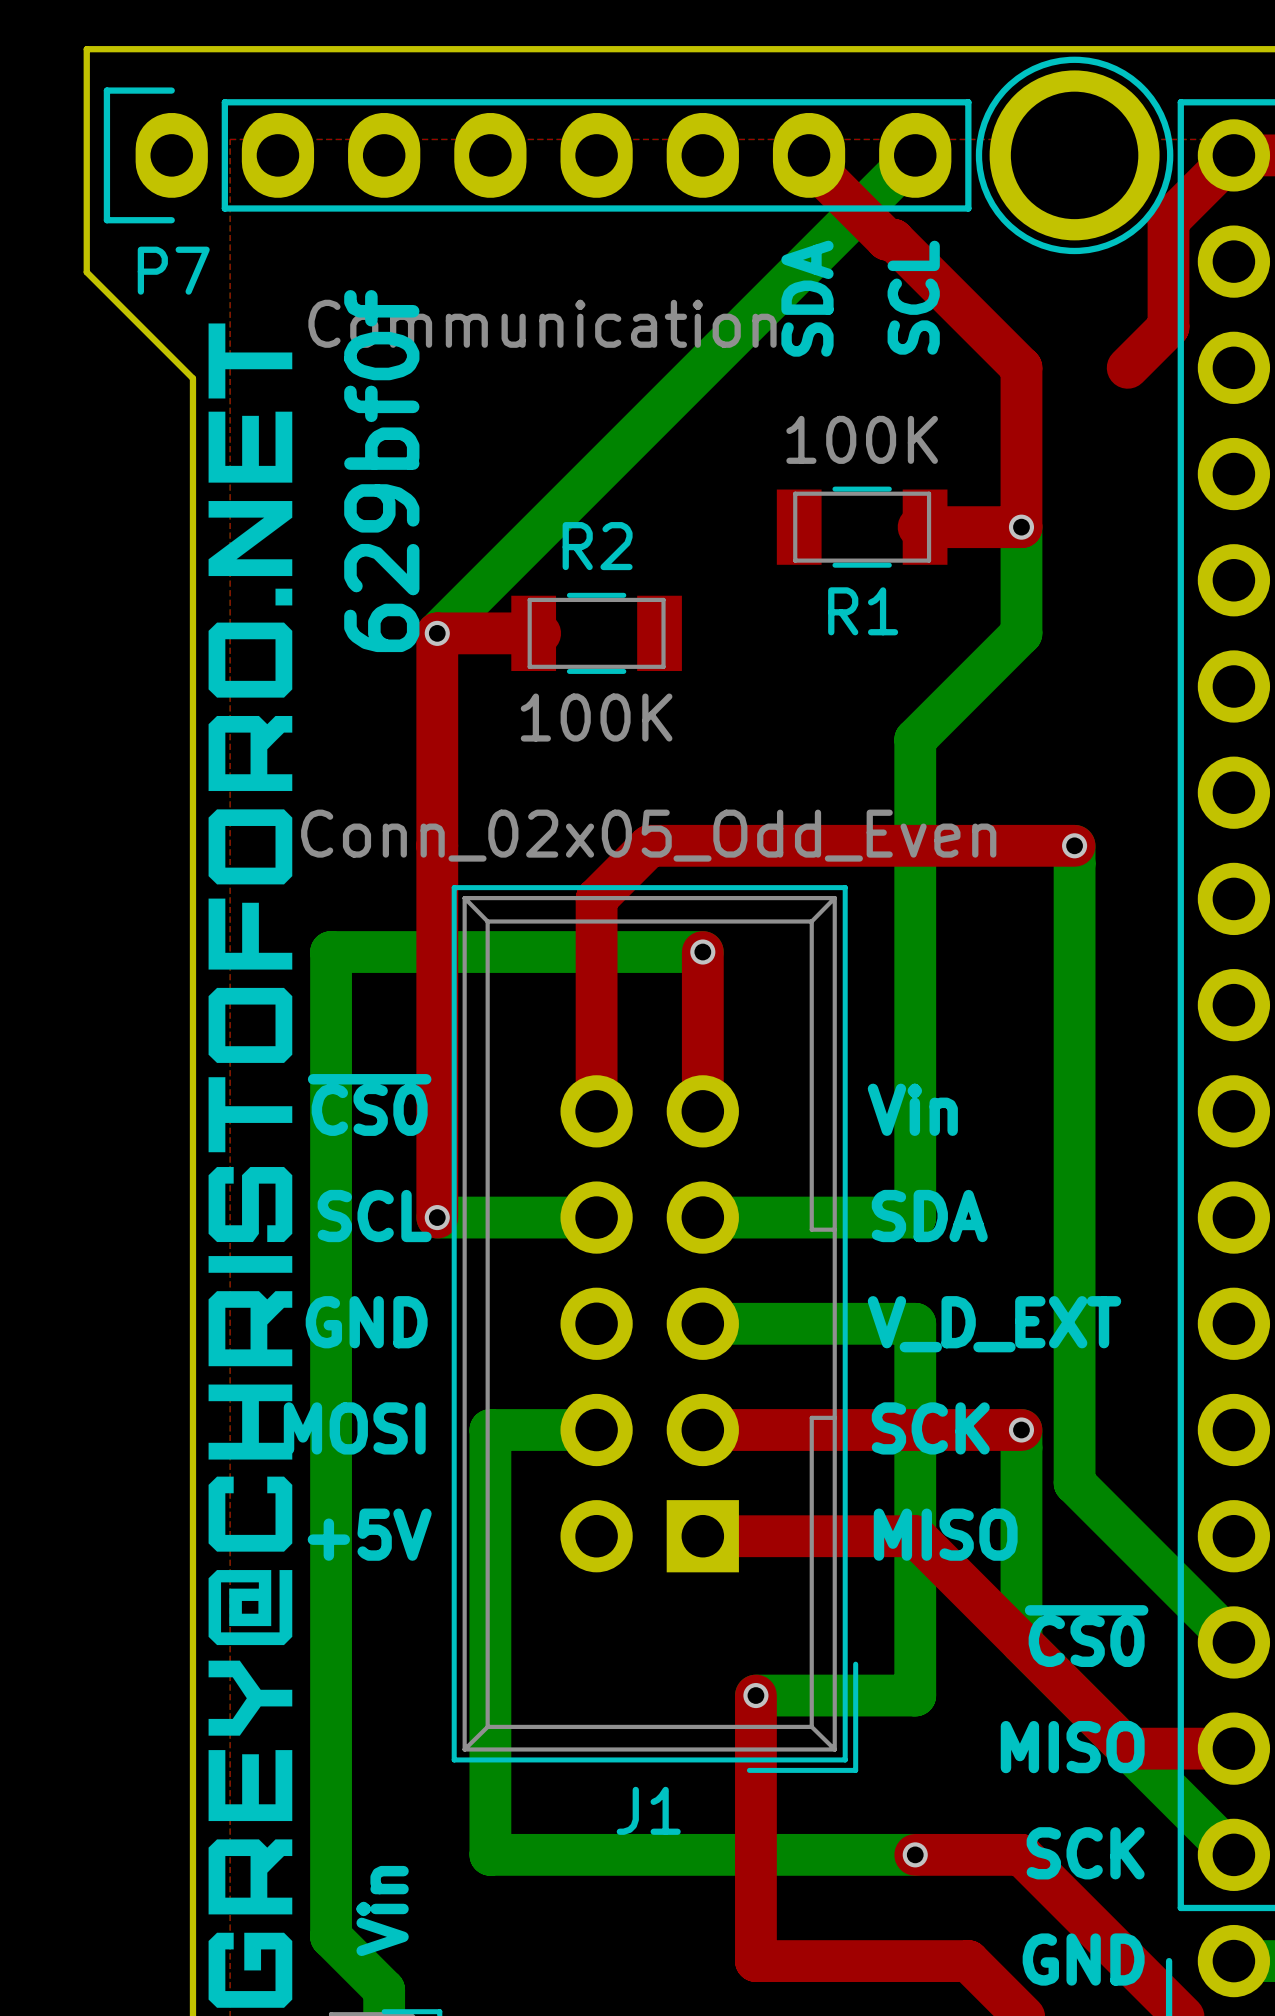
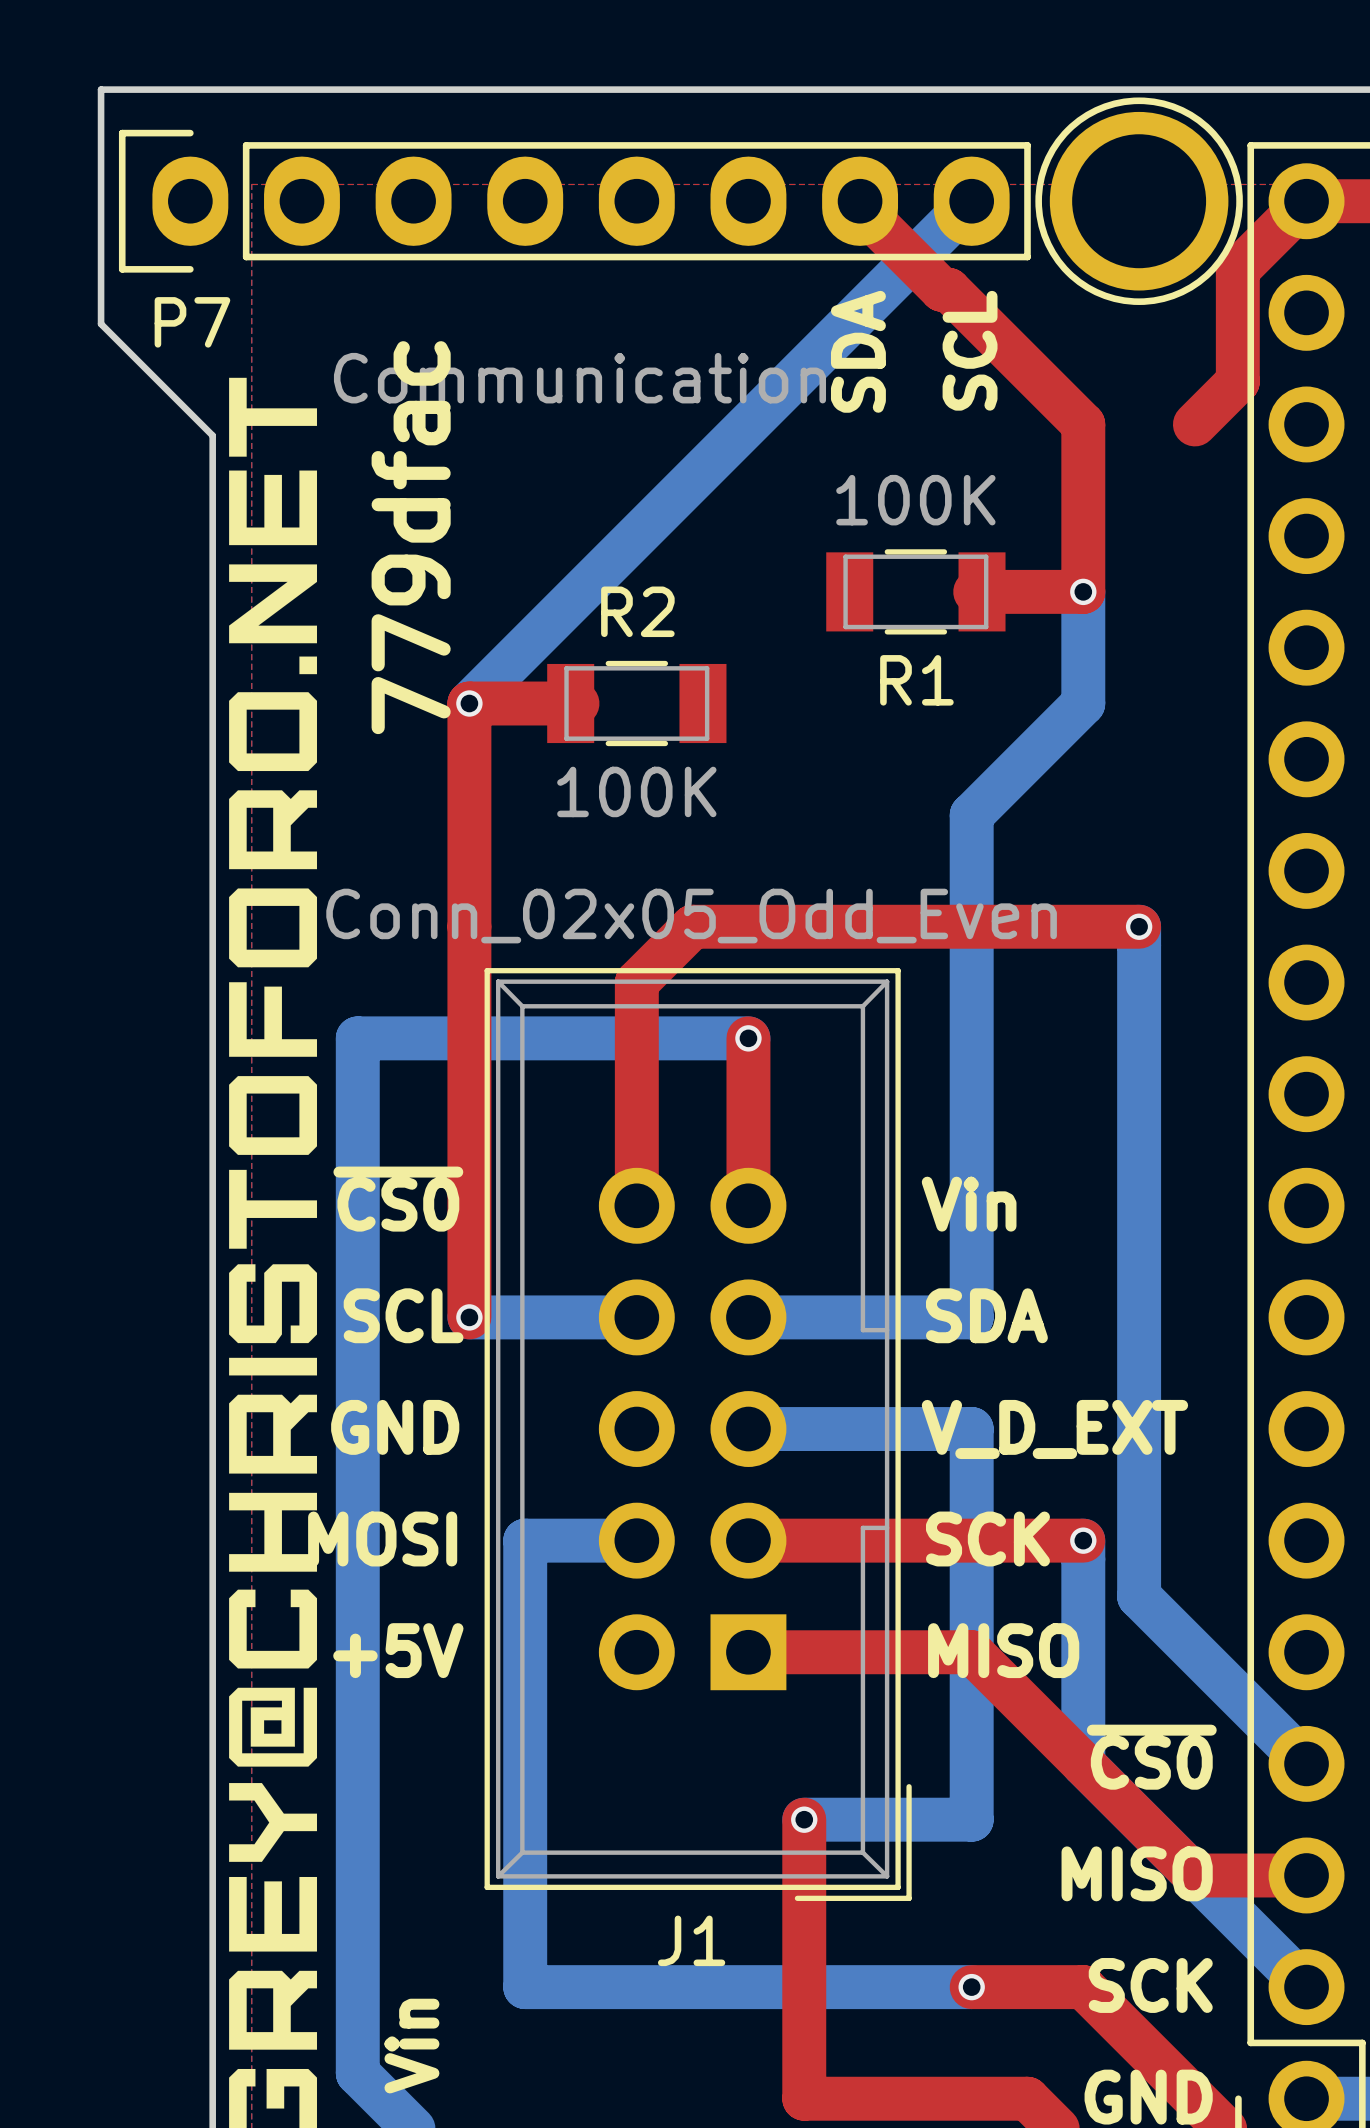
text: 629bf0f (381, 471) -> 779dfac (411, 537)

